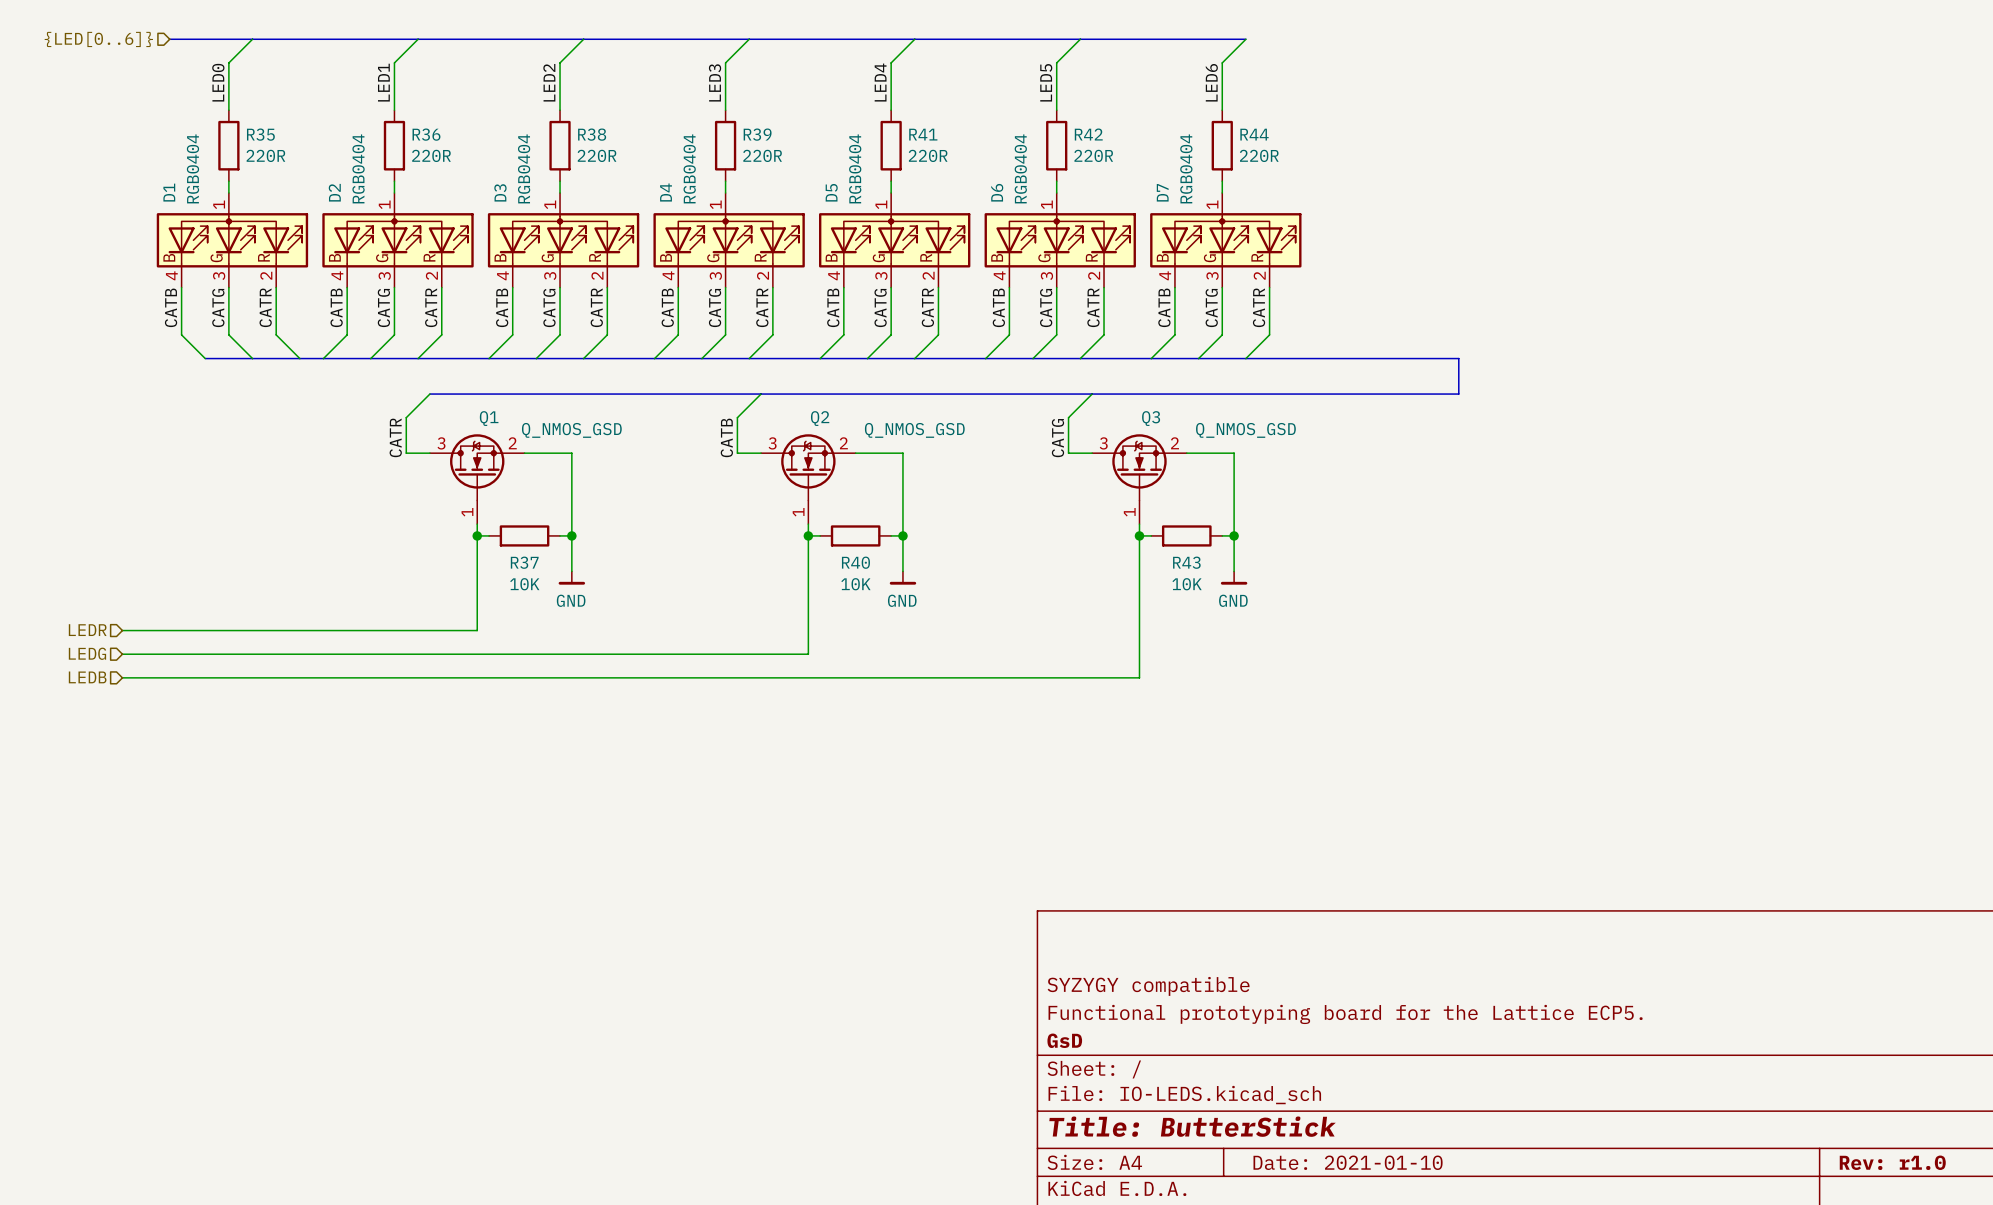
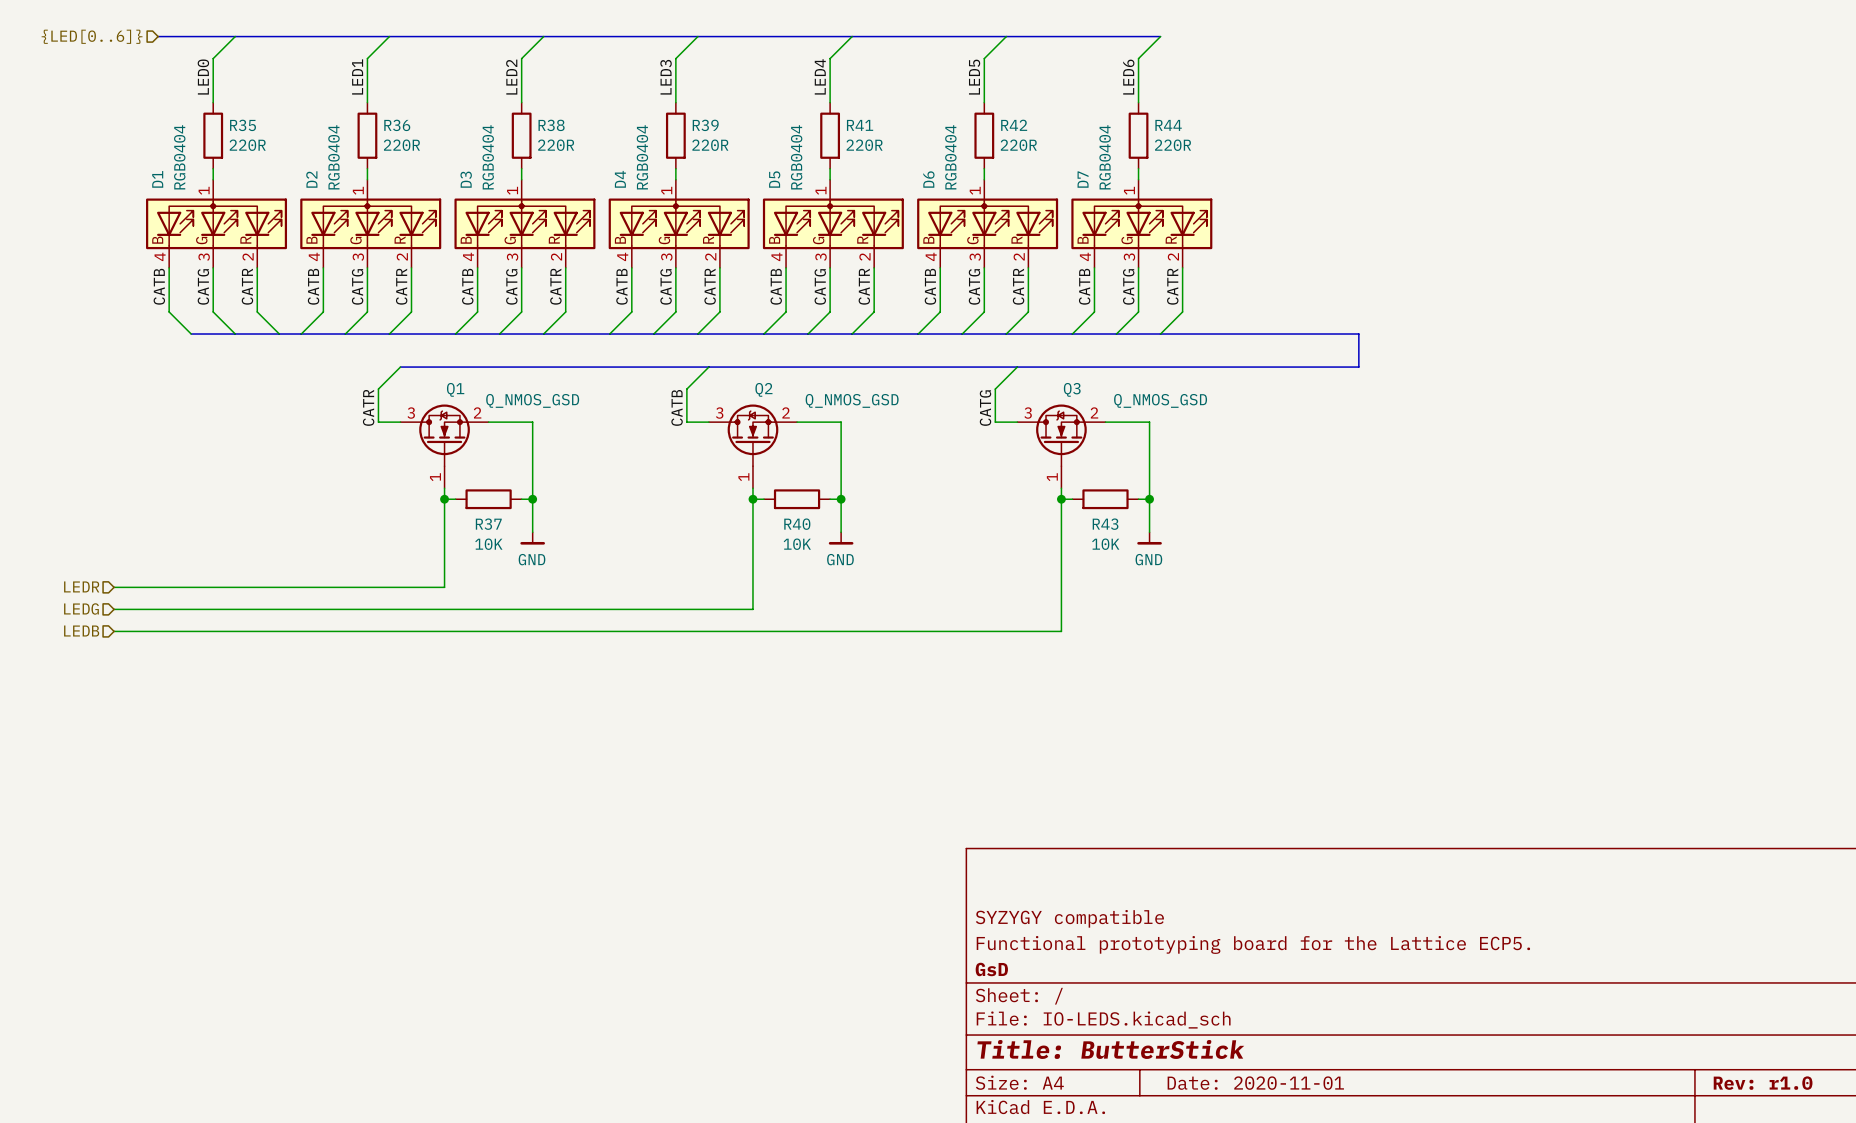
title block: Date: 2021-01-10 (1348, 1162) -> Date: 2020-11-01 (1255, 1083)

